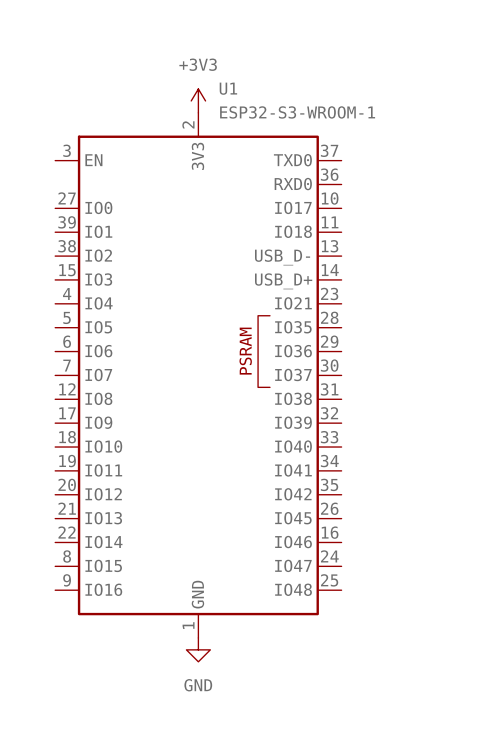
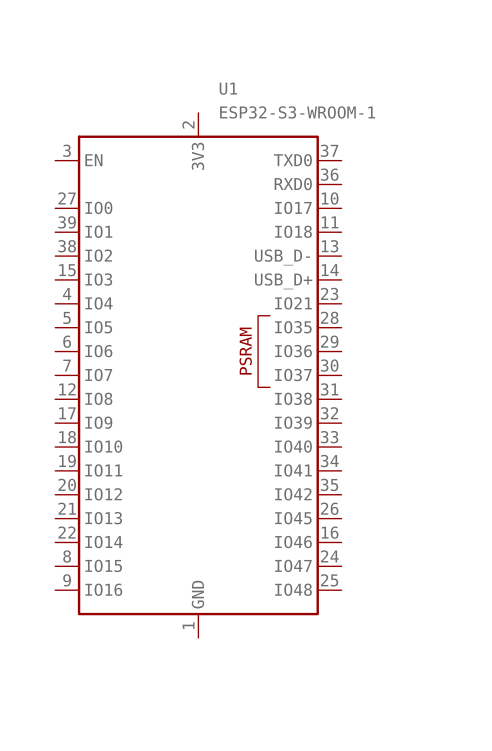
power symbol: +3V3 (198, 100) -> none
power symbol: GND (198, 649) -> none

